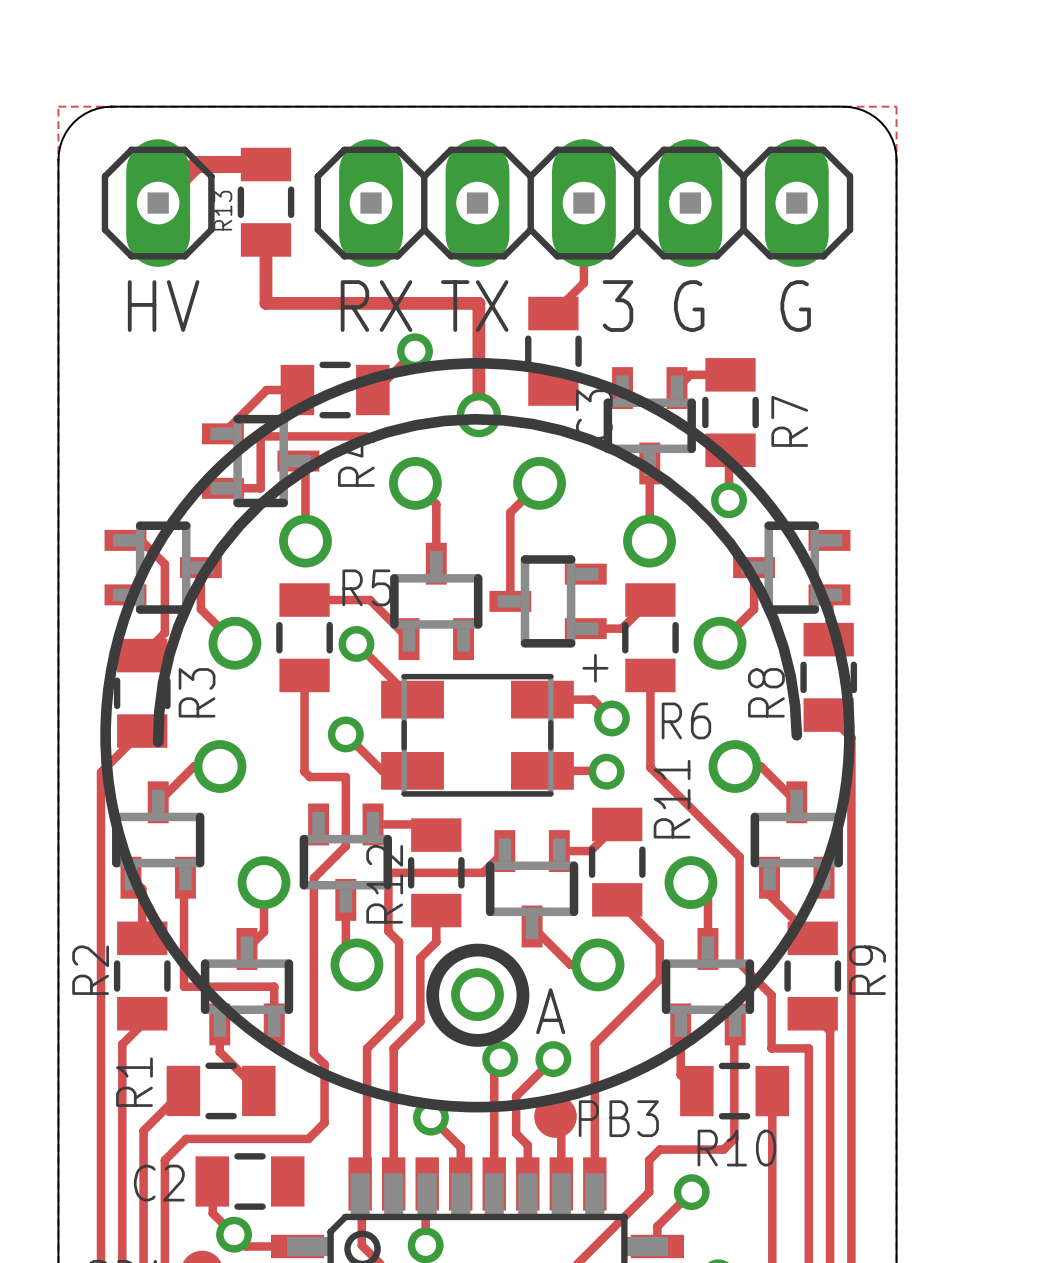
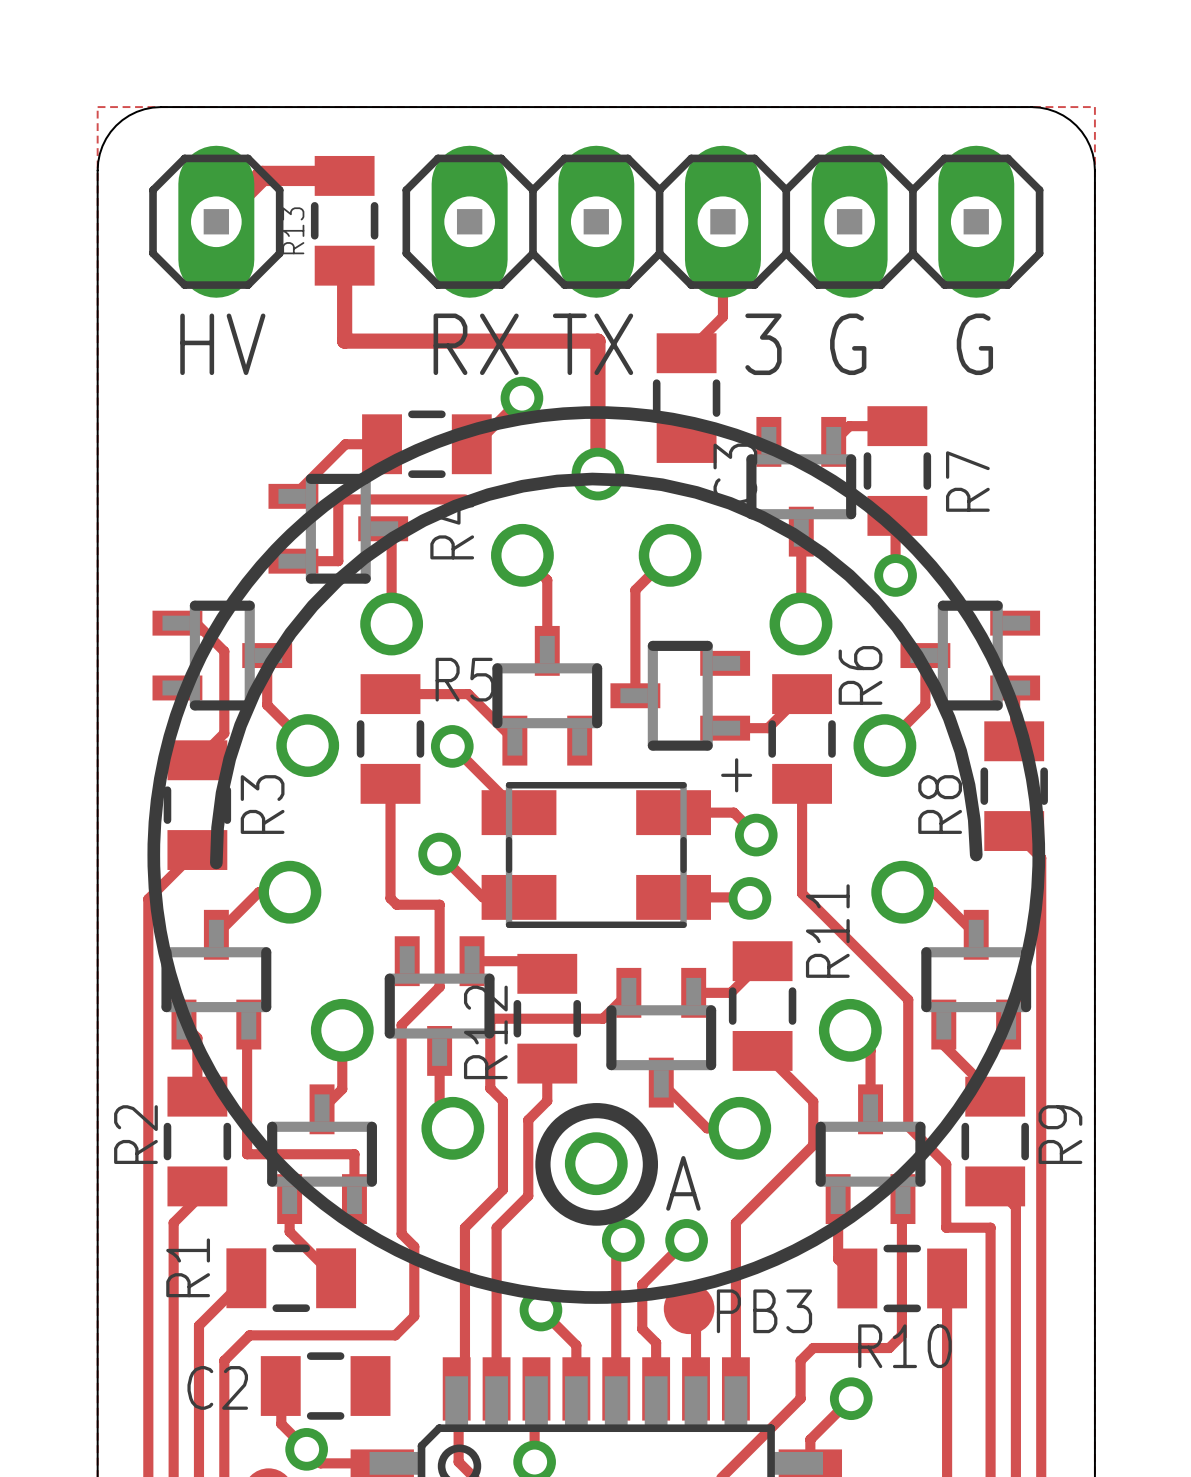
R6 name rotation: 0° (686, 720) -> 90° counterclockwise (860, 675)
R6 name position: R6 (686, 720) -> R6 (860, 675)

